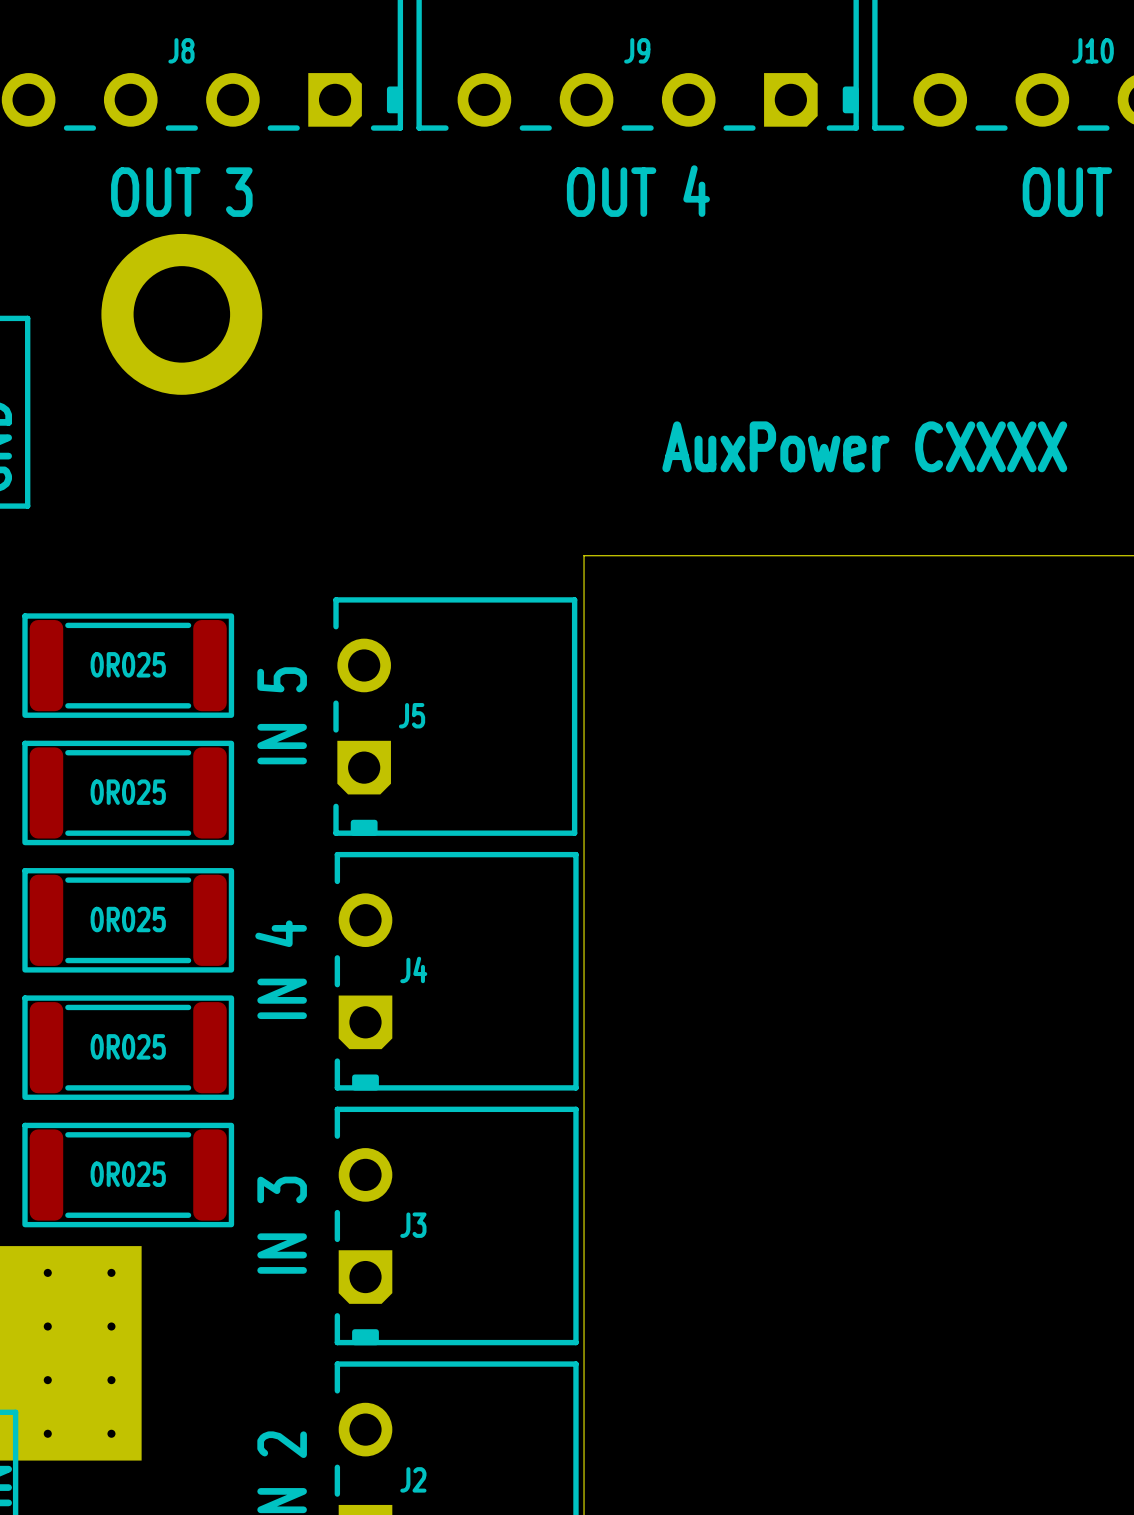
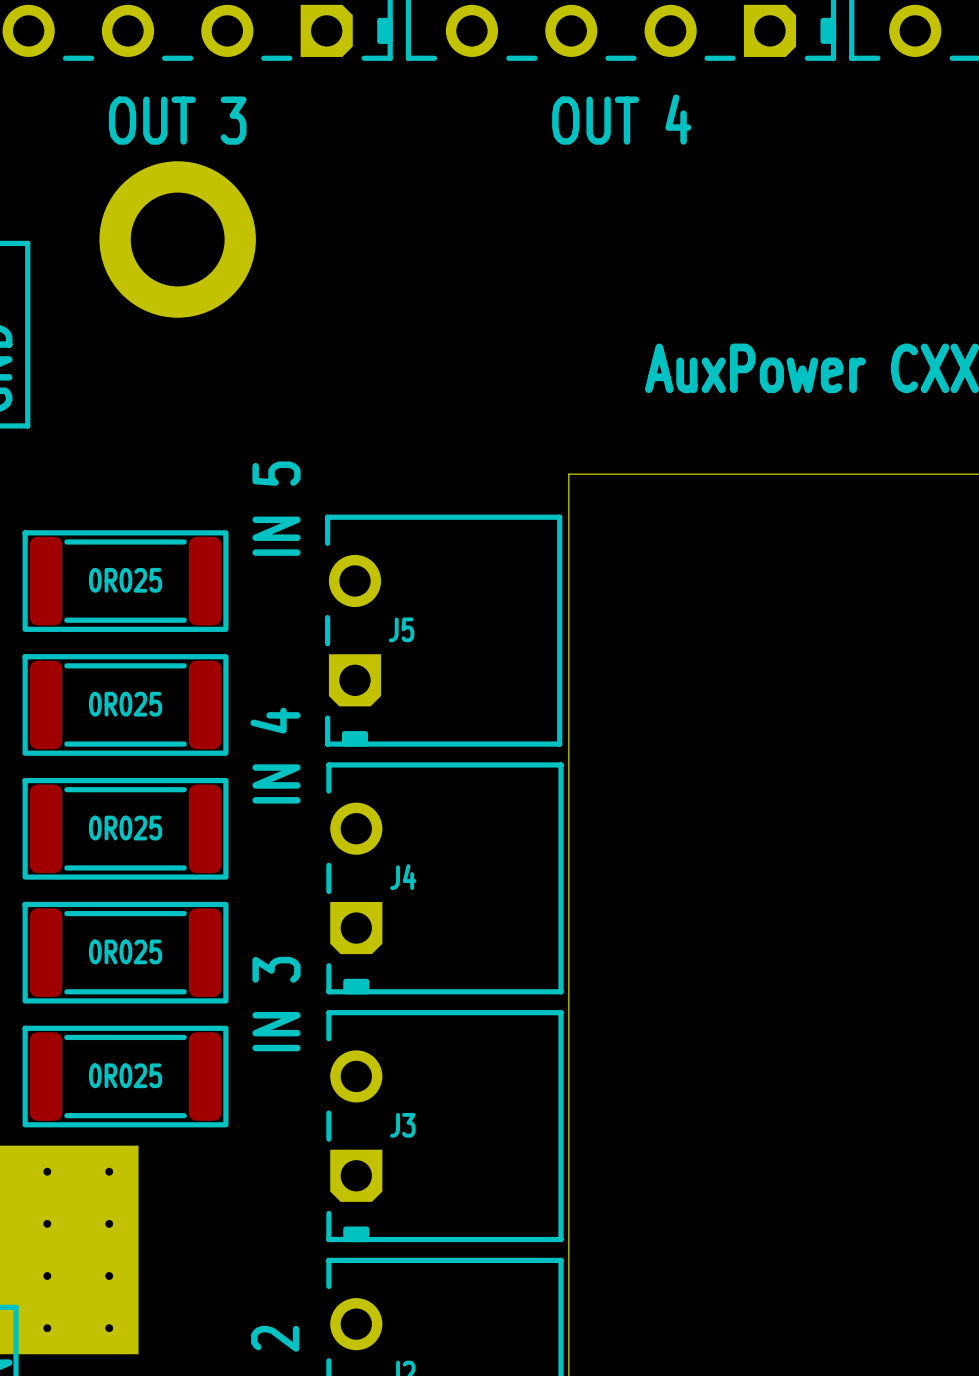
text position: IN 5 (282, 715) -> IN 5 (276, 508)
text position: IN 4 (281, 969) -> IN 4 (275, 755)
text position: IN 3 (282, 1225) -> IN 3 (276, 1004)

